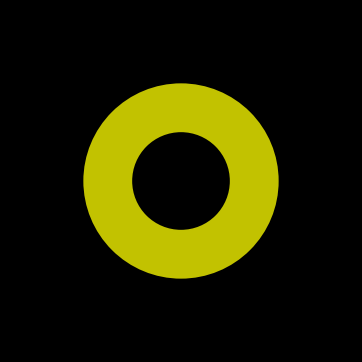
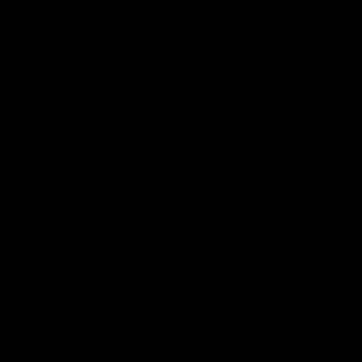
part: (180, 180) -> none

